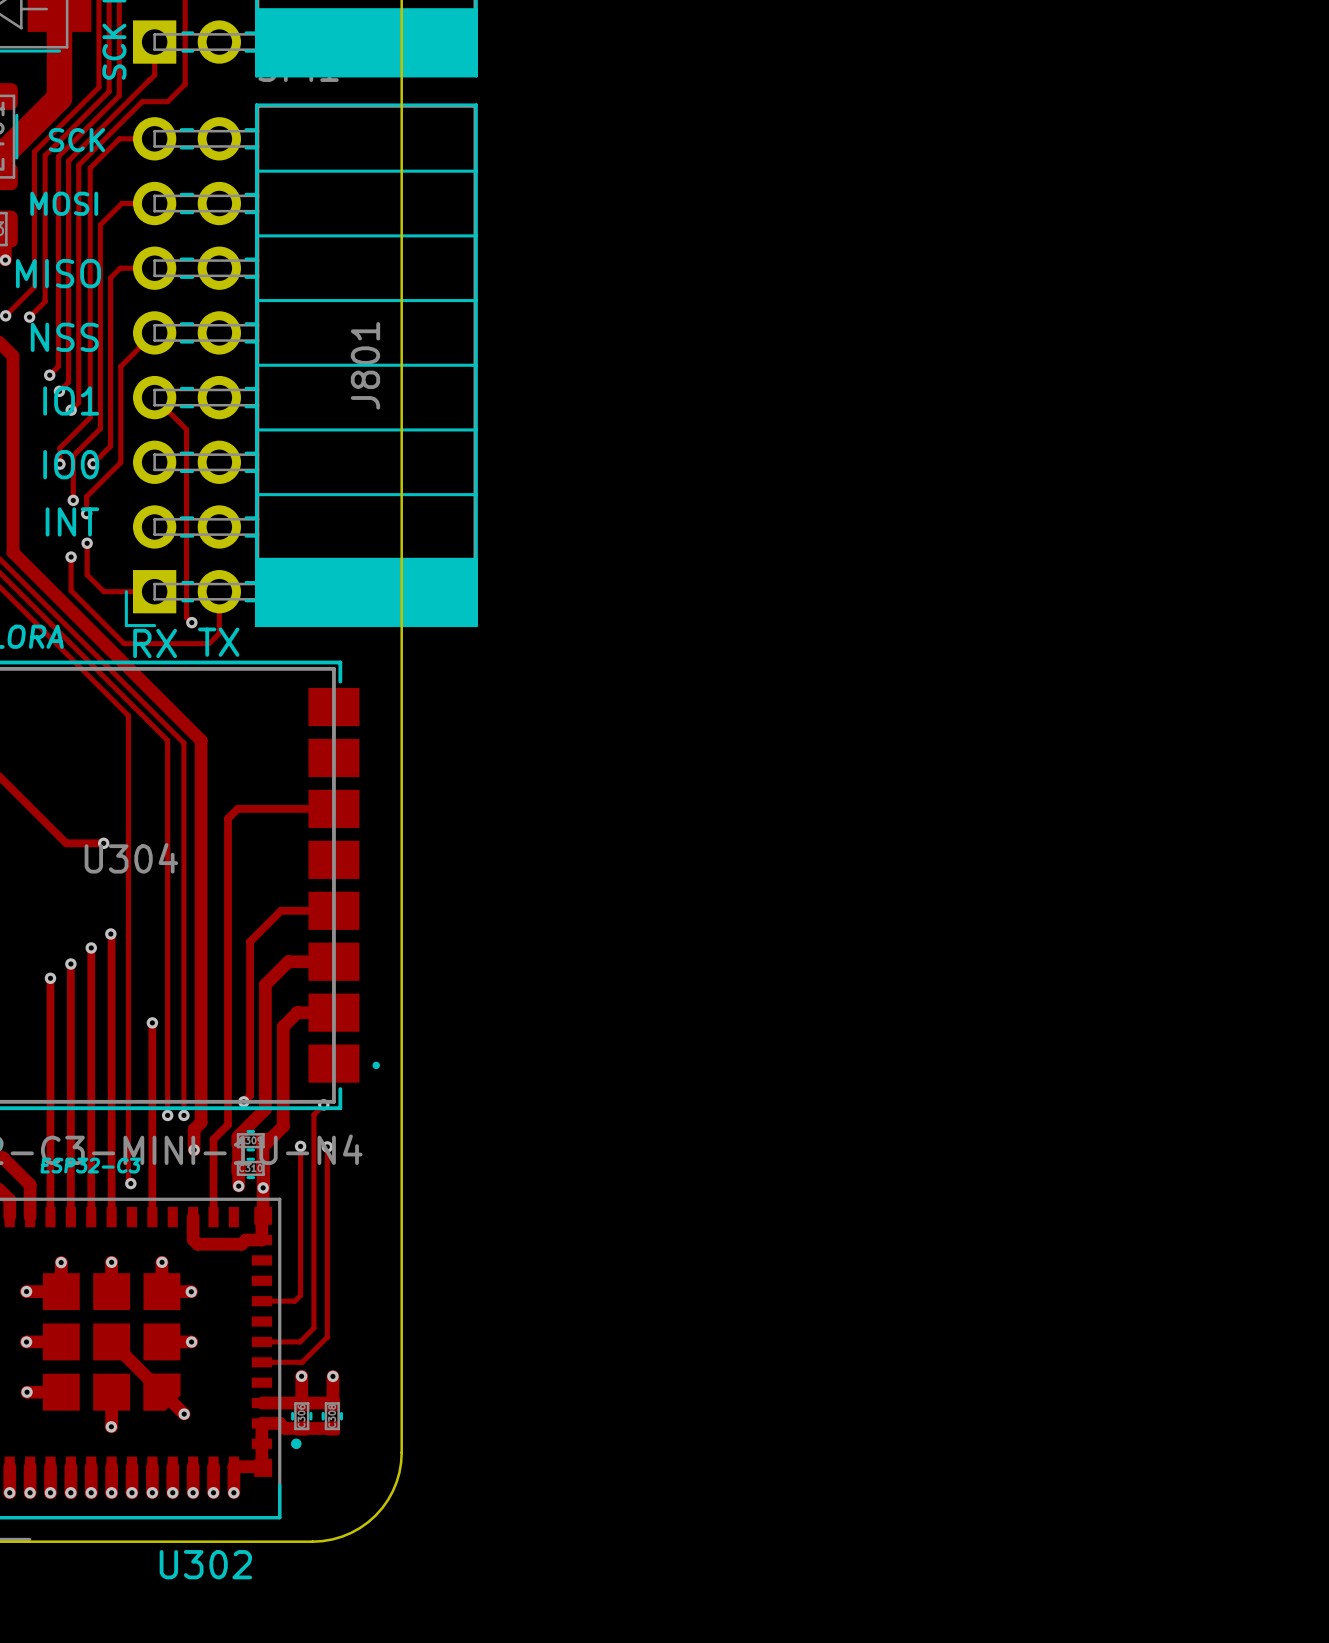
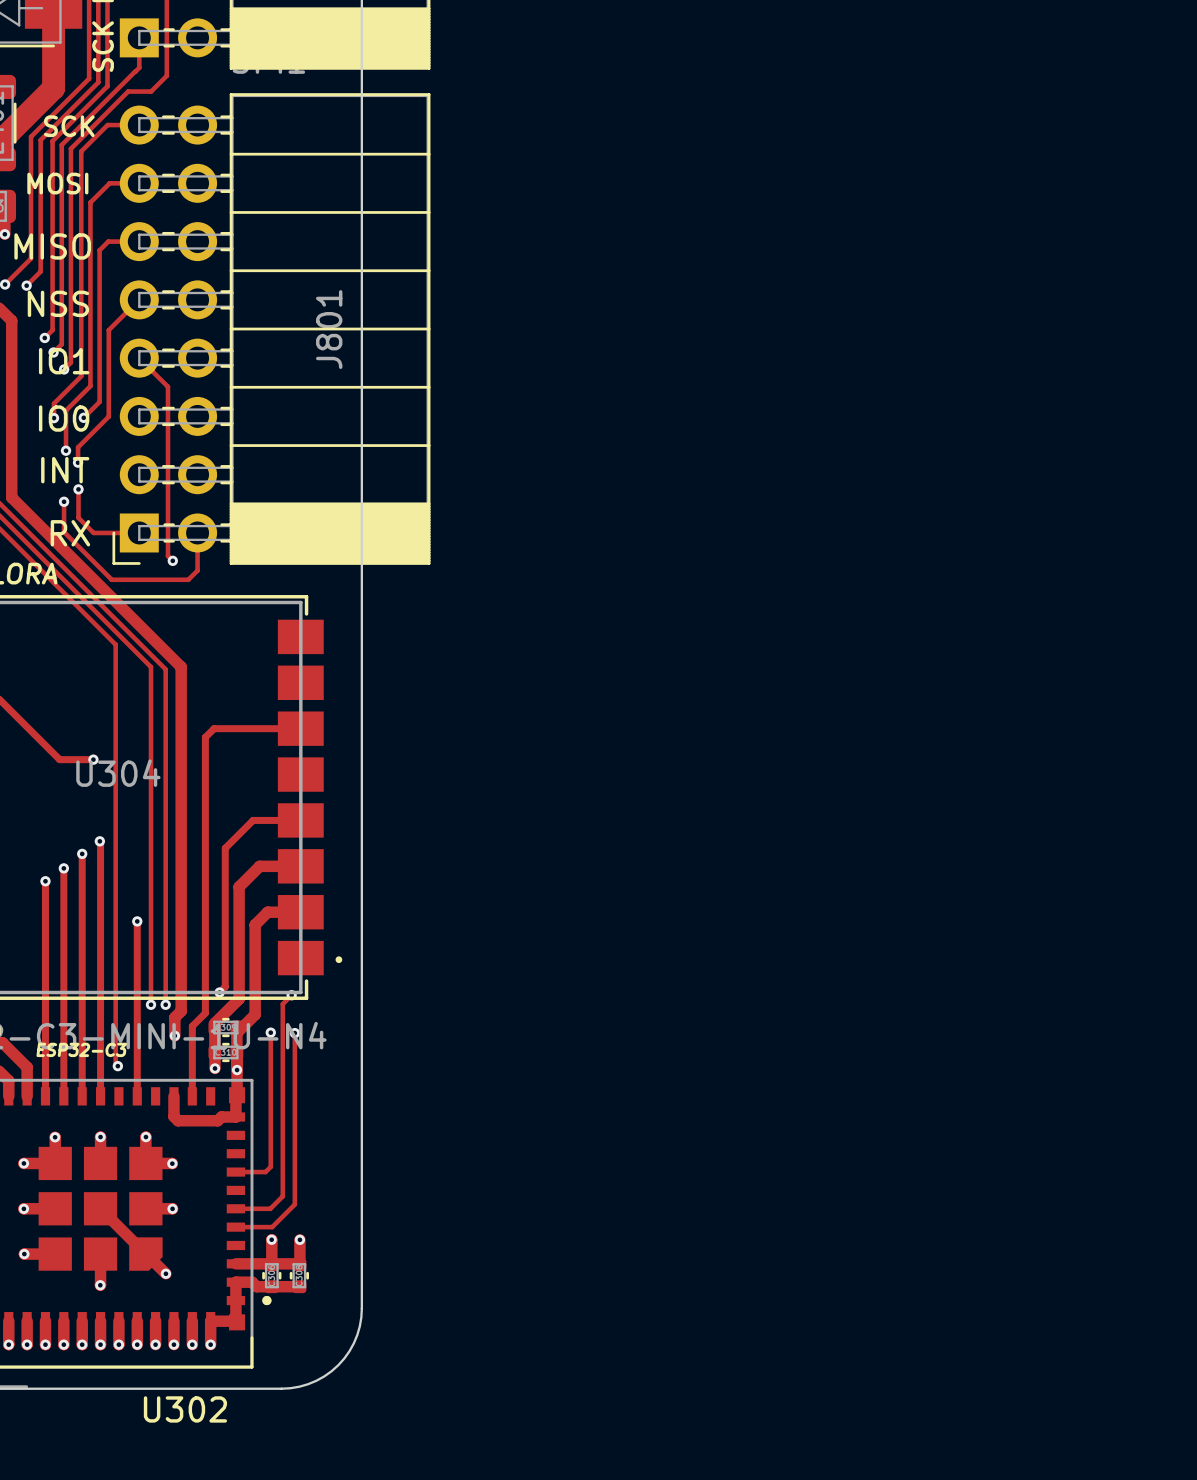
text: TX (218, 642) -> none
text position: RX (155, 643) -> RX (70, 533)

